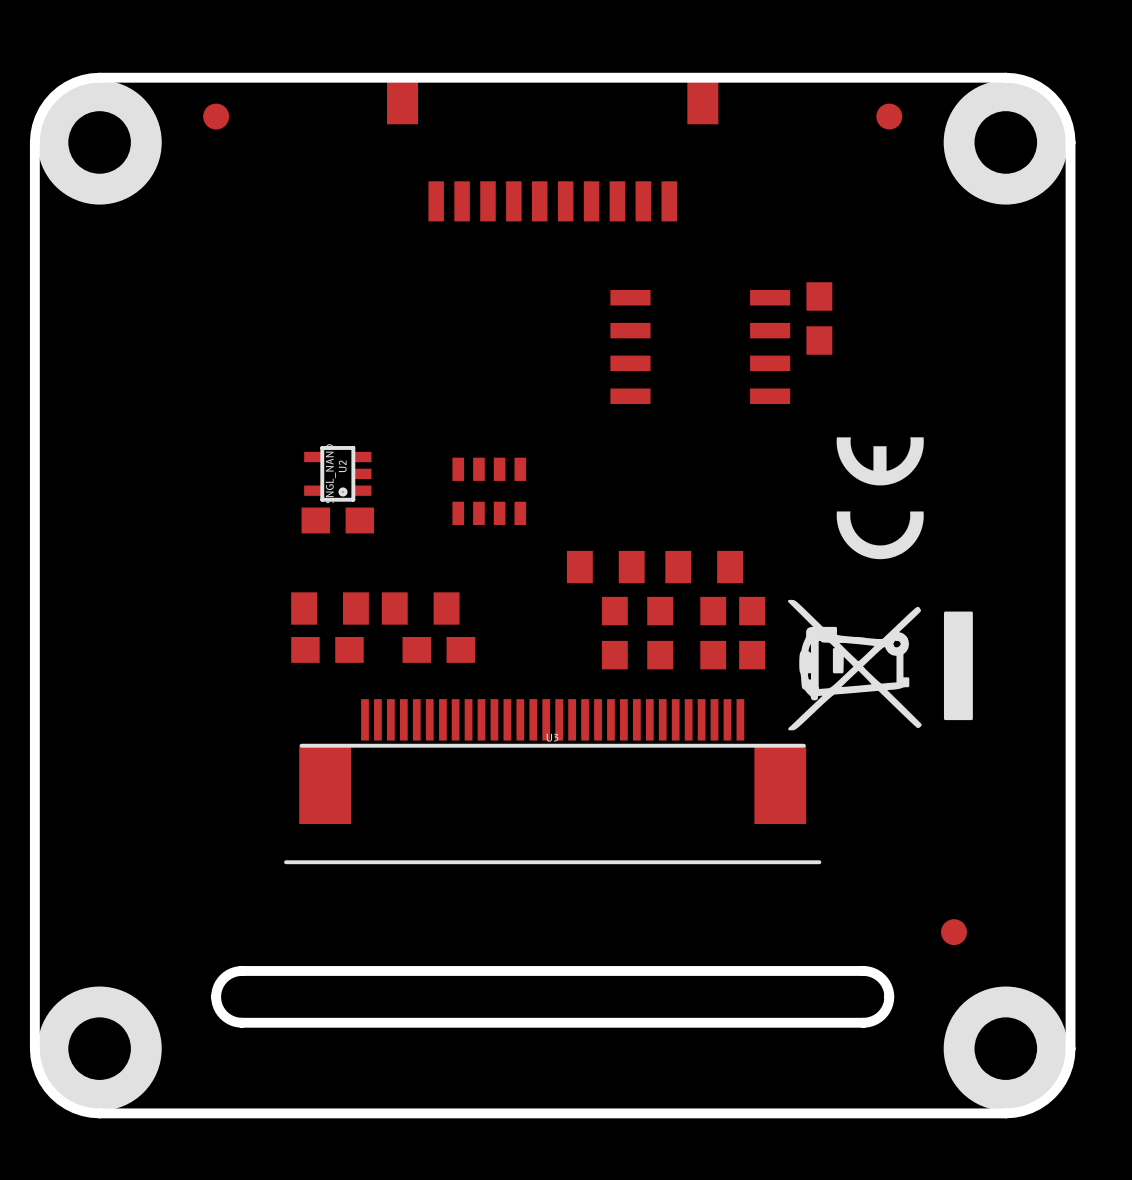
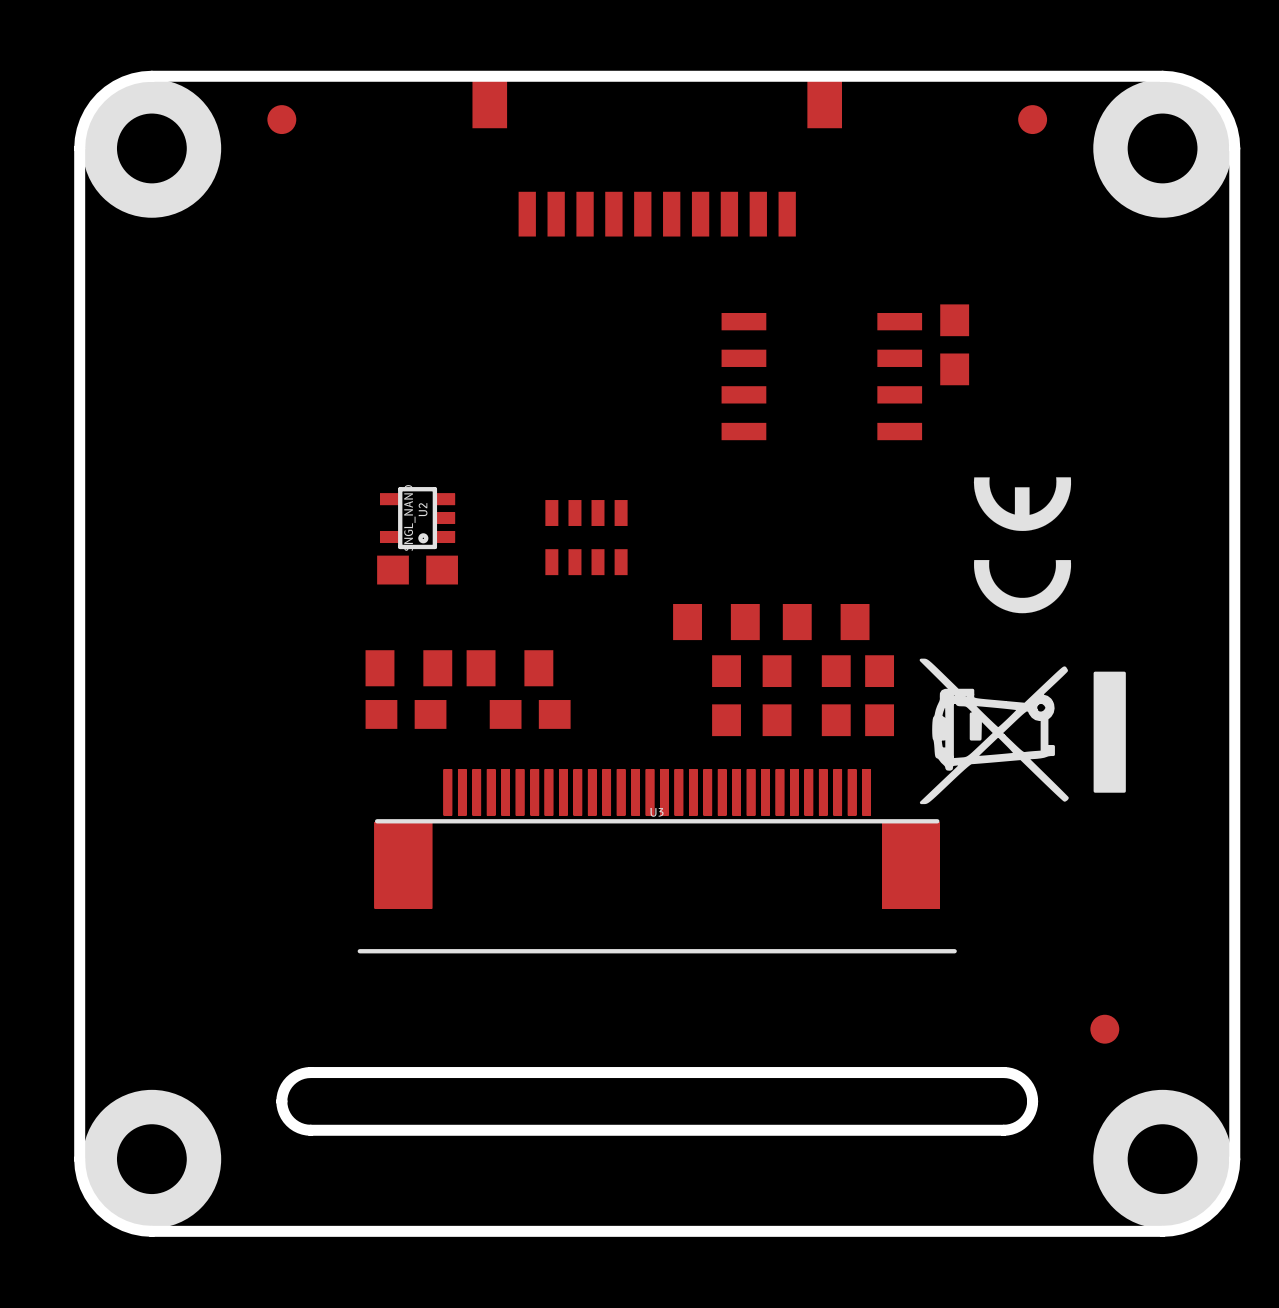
part: none -> (417, 518)
part: none -> (657, 838)

